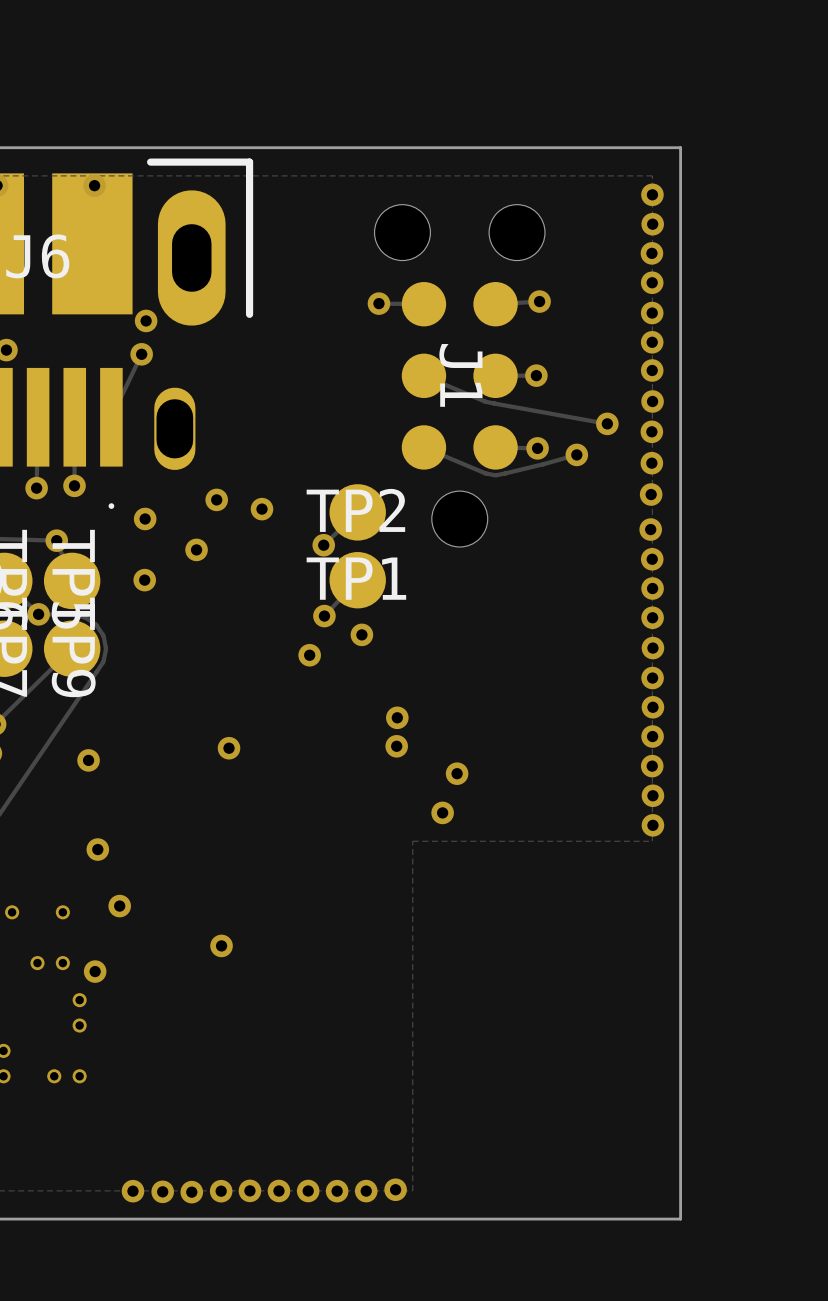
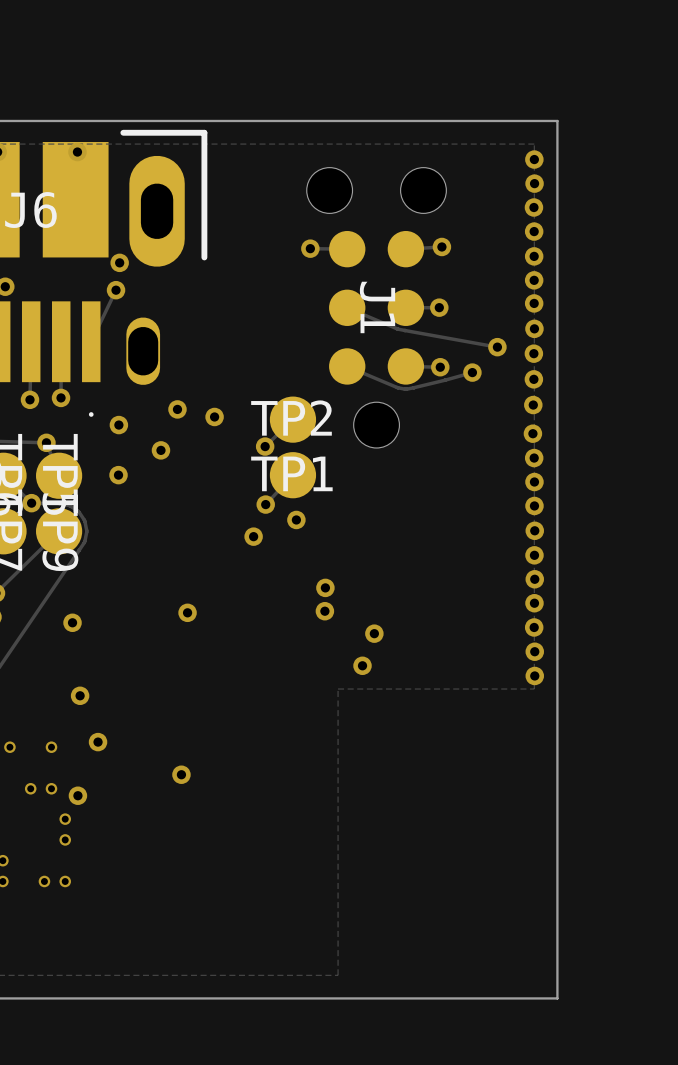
via: (395, 1189) -> none
via: (249, 1190) -> none
via: (132, 1191) -> none
via: (162, 1191) -> none
via: (221, 1191) -> none
via: (278, 1191) -> none
via: (308, 1191) -> none
via: (337, 1191) -> none
via: (366, 1191) -> none
via: (191, 1192) -> none

